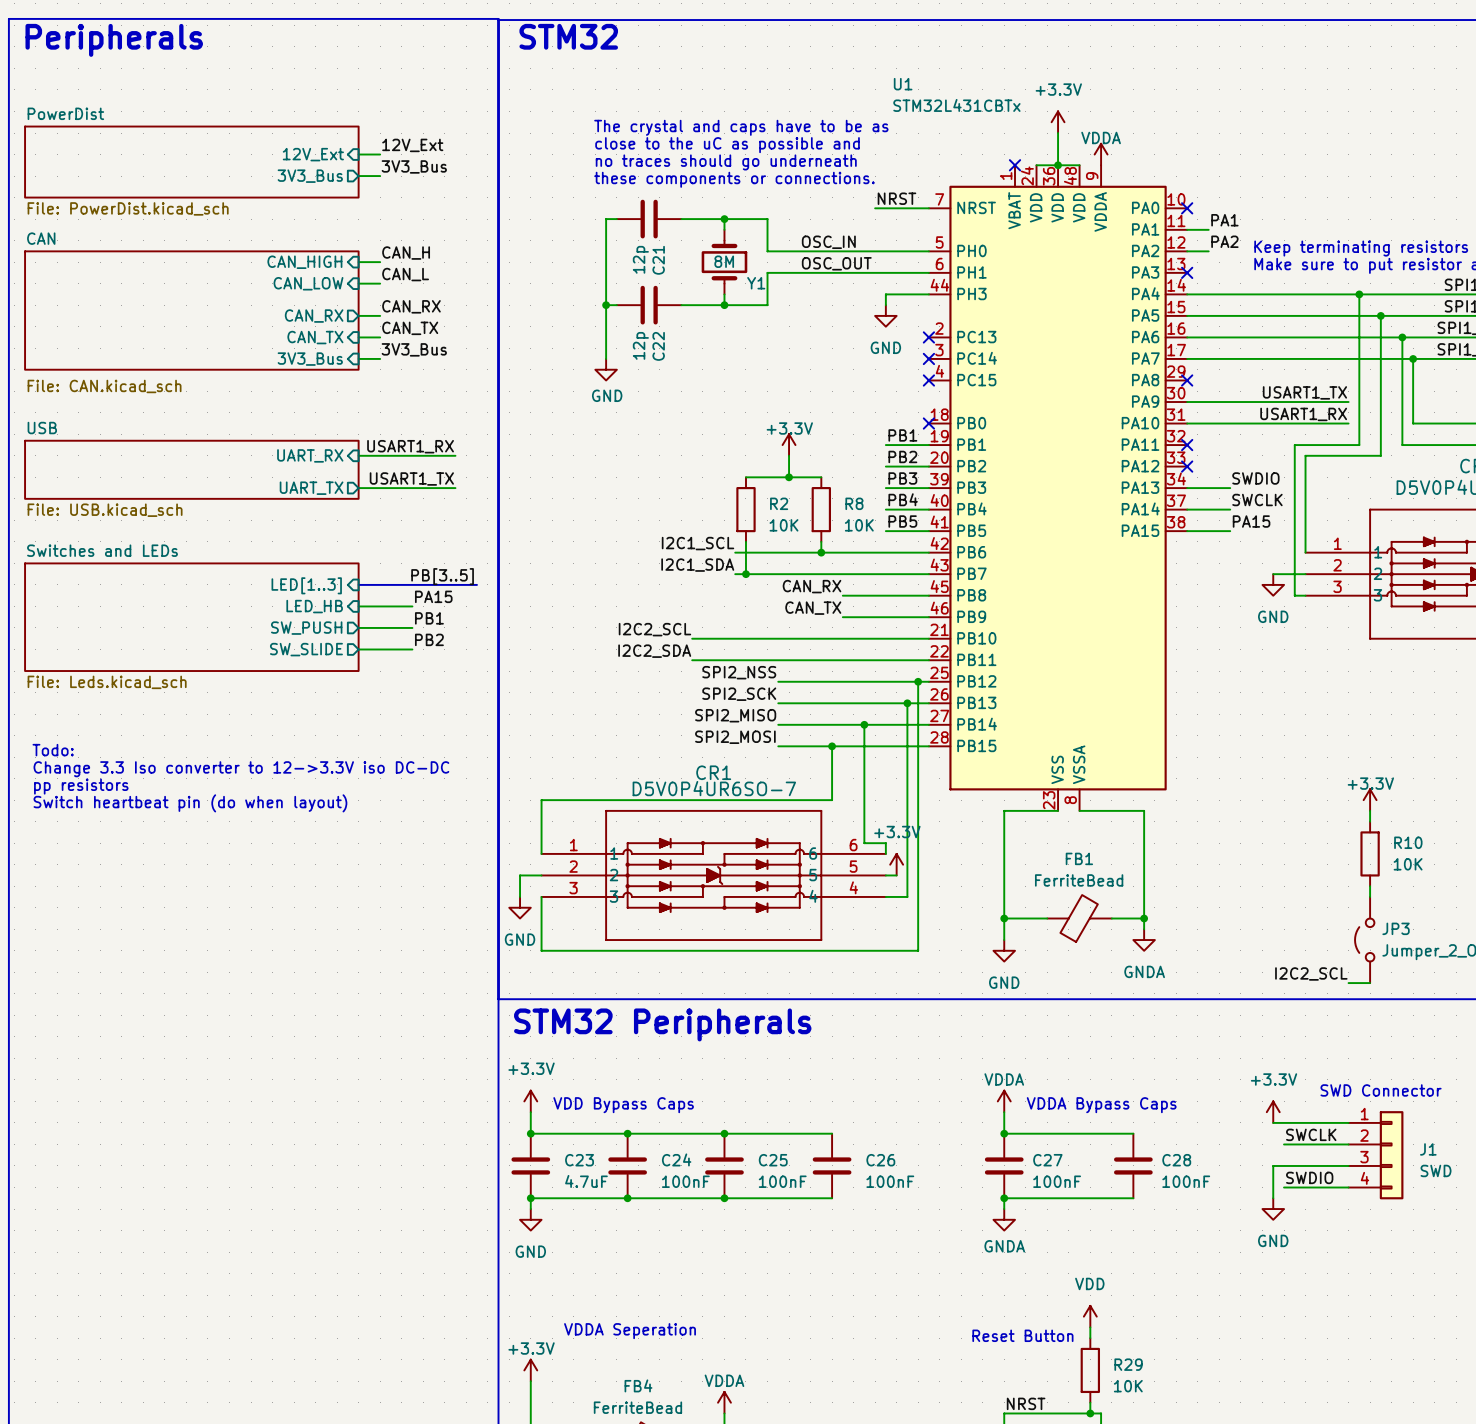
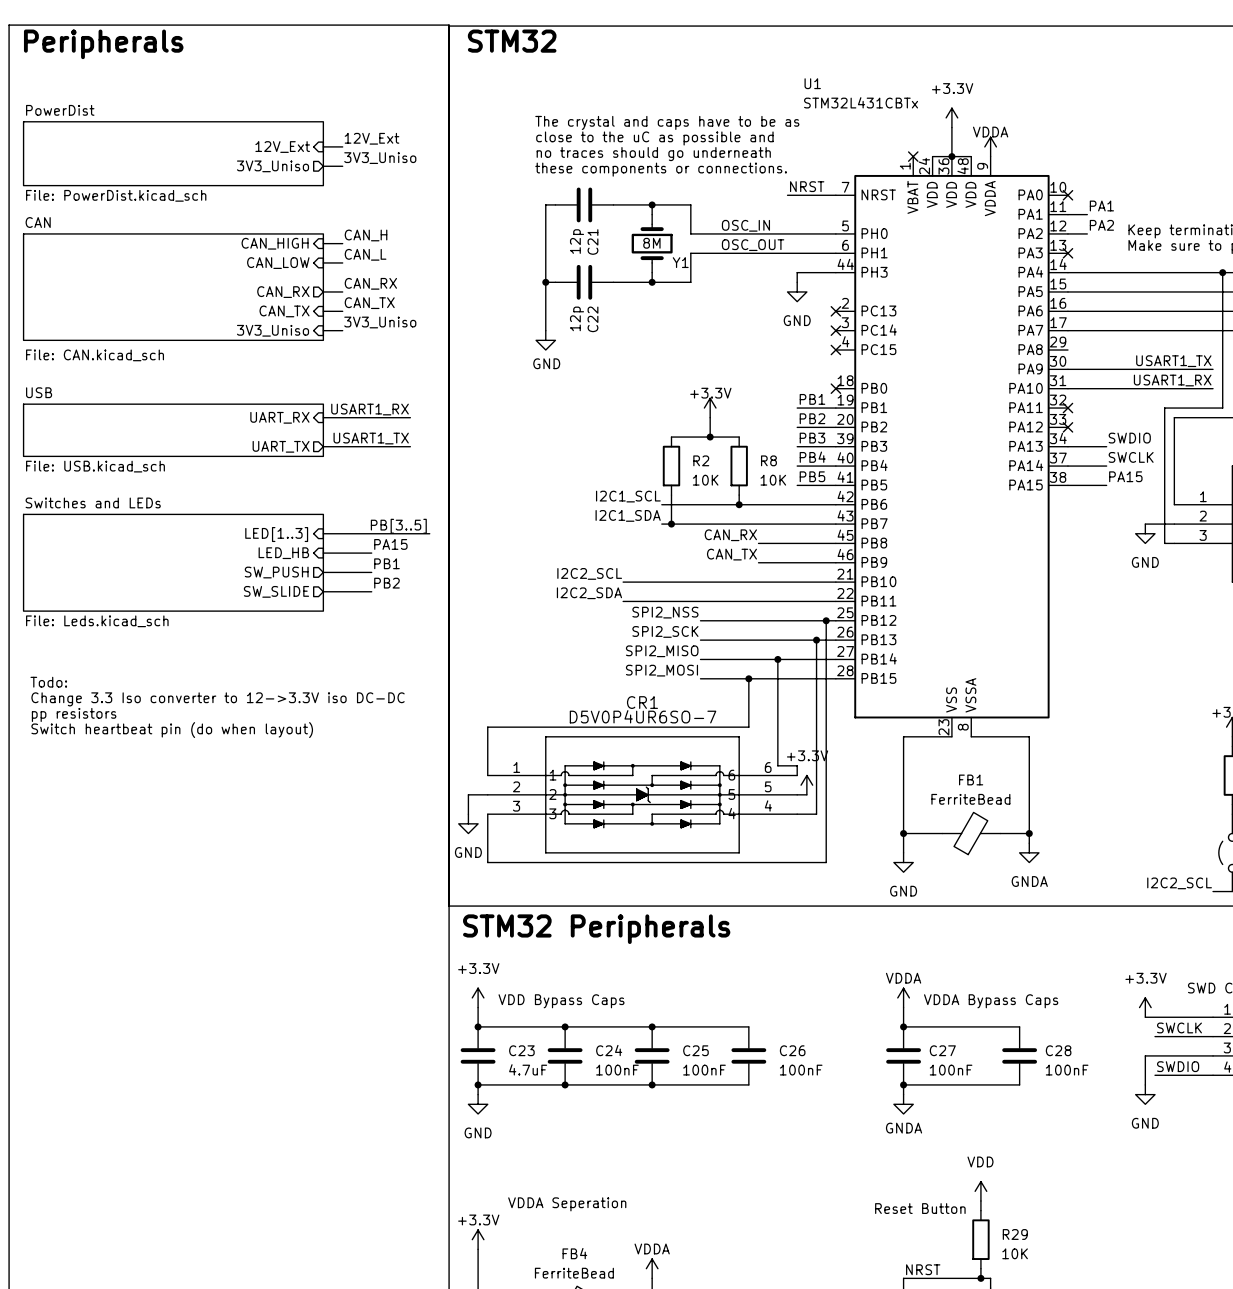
label: 3V3_Bus (414, 166) -> 3V3_Uniso (380, 158)
sheet pin: 3V3_Bus (310, 176) -> 3V3_Uniso (273, 166)
label: 3V3_Bus (414, 349) -> 3V3_Uniso (380, 322)
sheet pin: 3V3_Bus (310, 359) -> 3V3_Uniso (273, 330)
no-connect mark: (1187, 380) -> none

